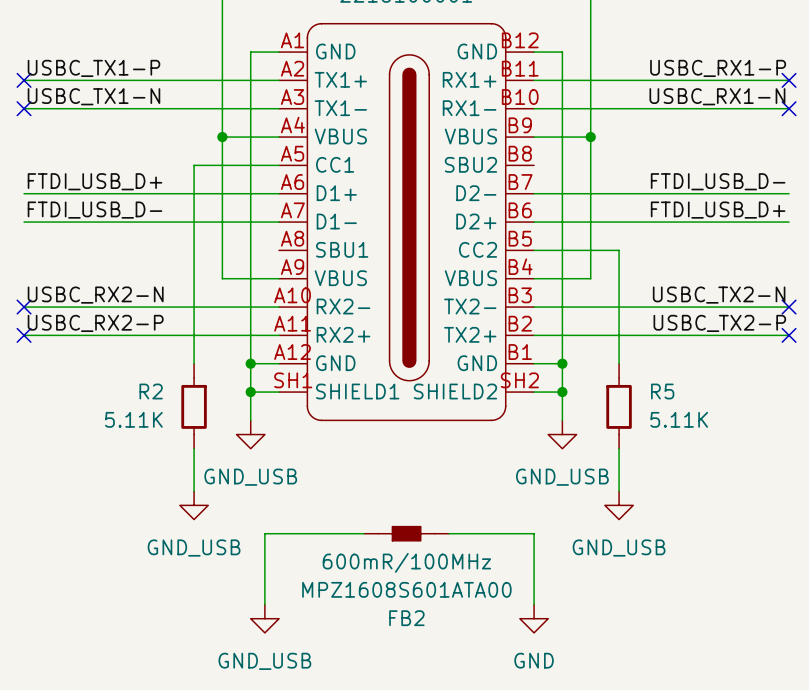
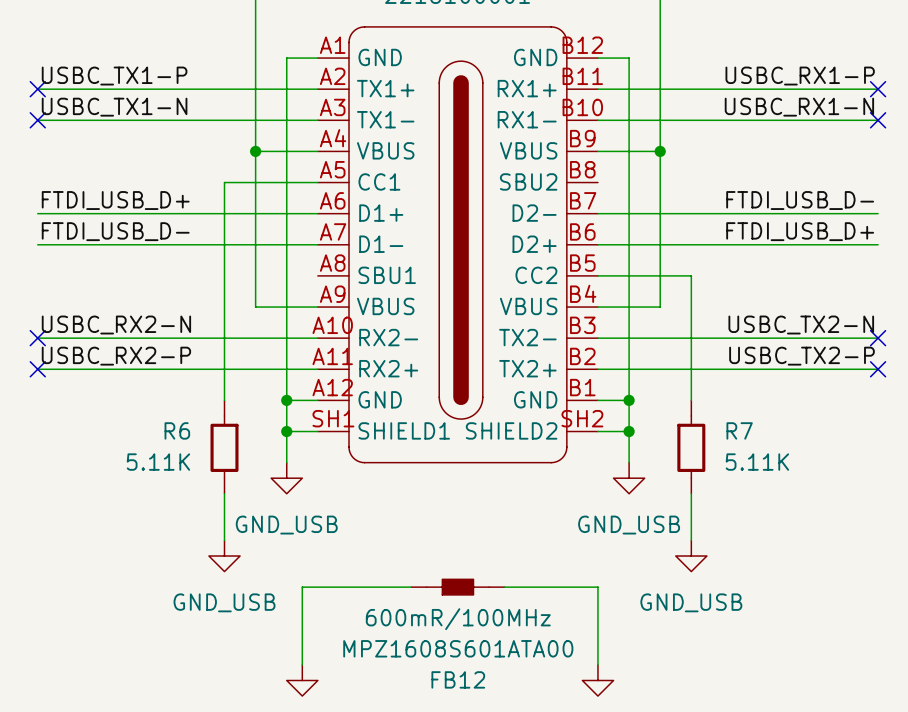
R2 name: R2 (151, 391) -> R6 (177, 430)
R5 name: R5 (662, 391) -> R7 (739, 430)
FB2 name: FB2 (406, 618) -> FB12 (458, 679)

